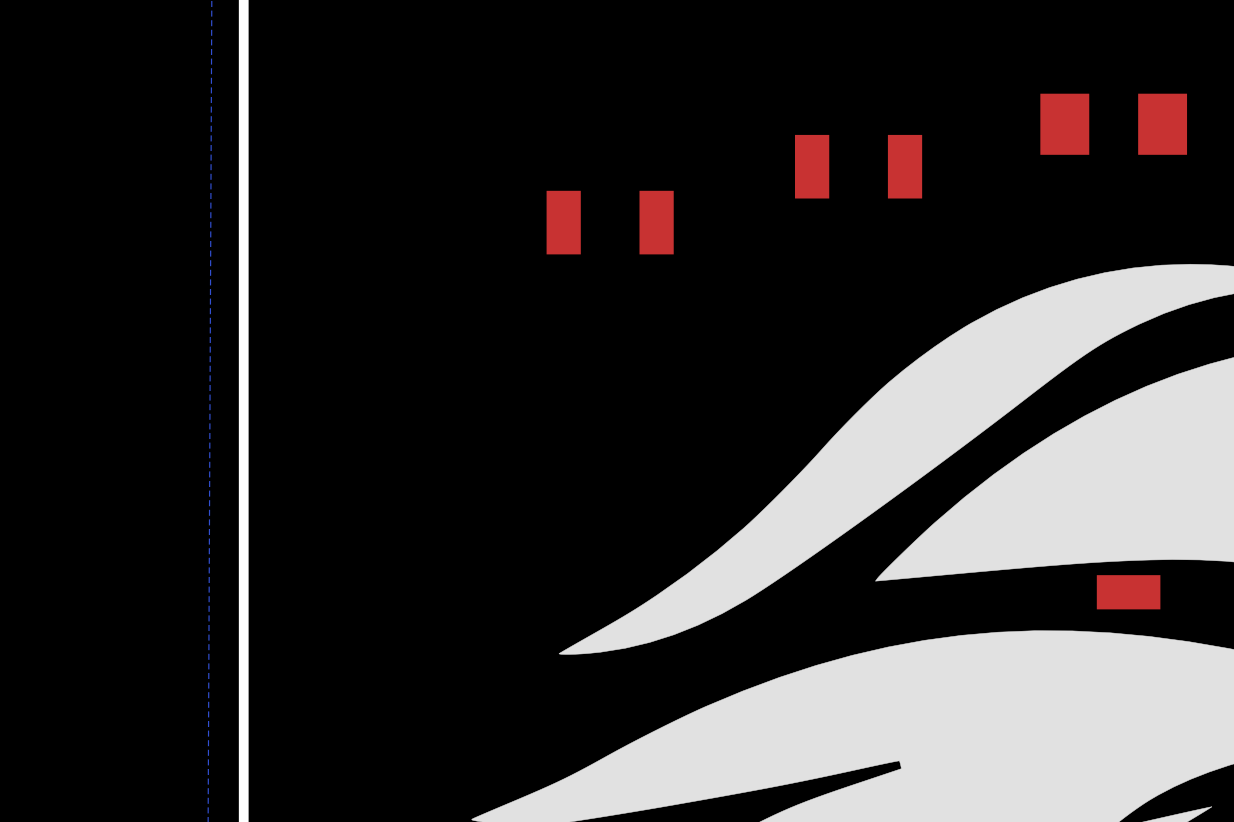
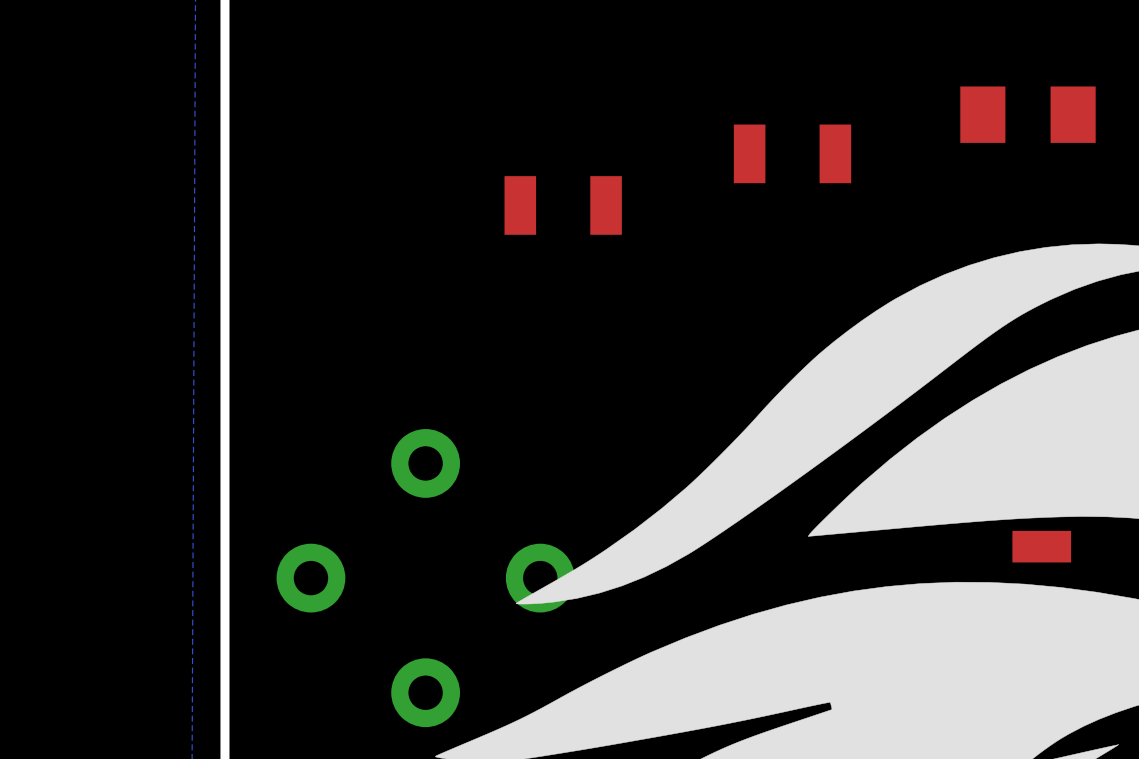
part: none -> (425, 578)

